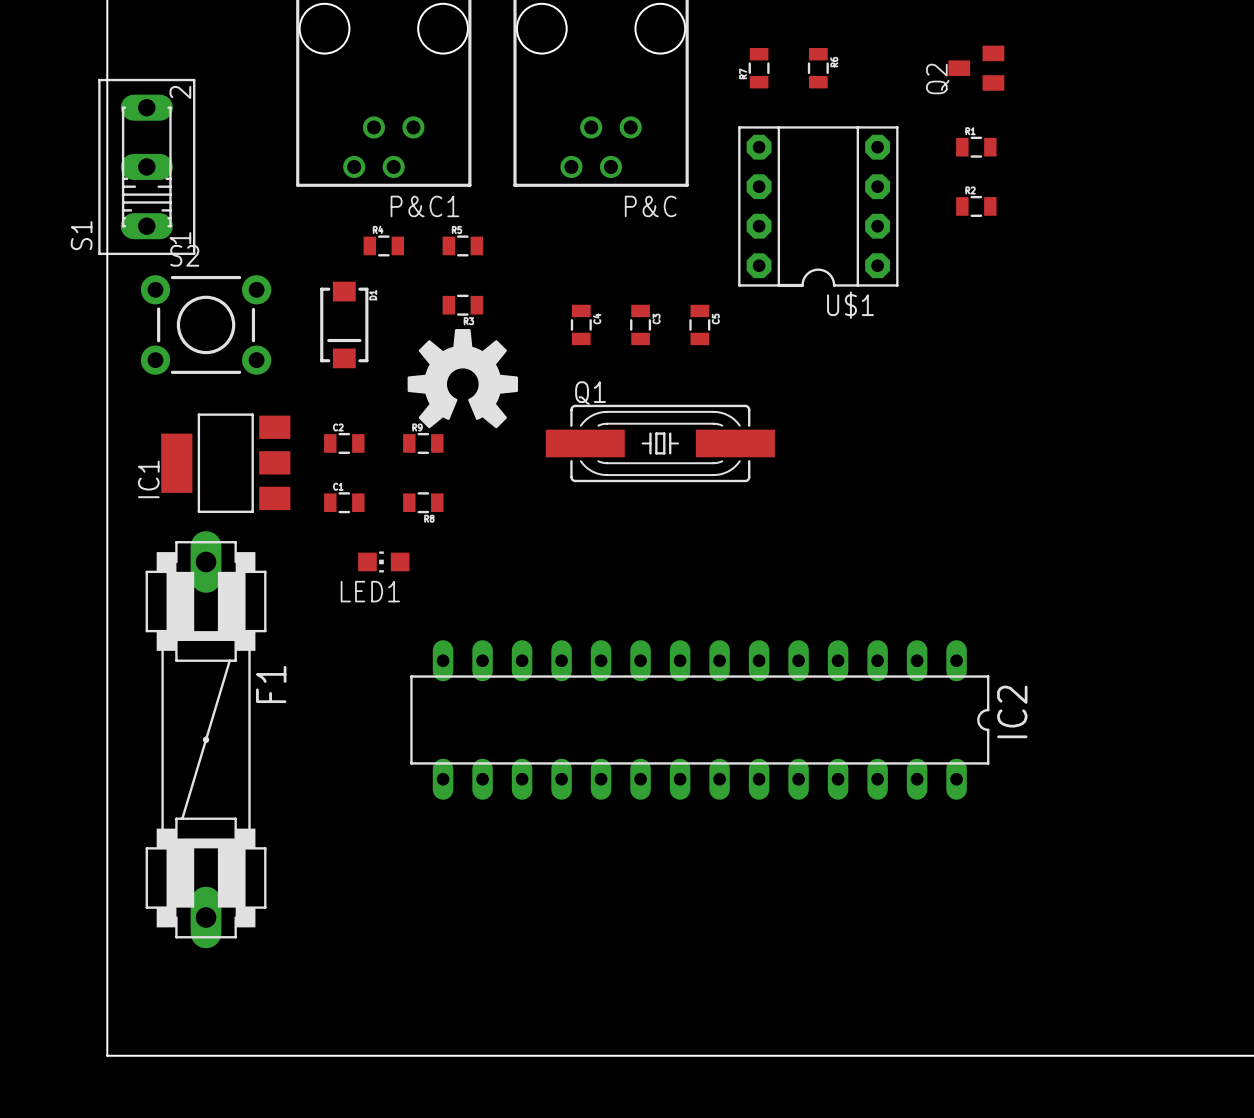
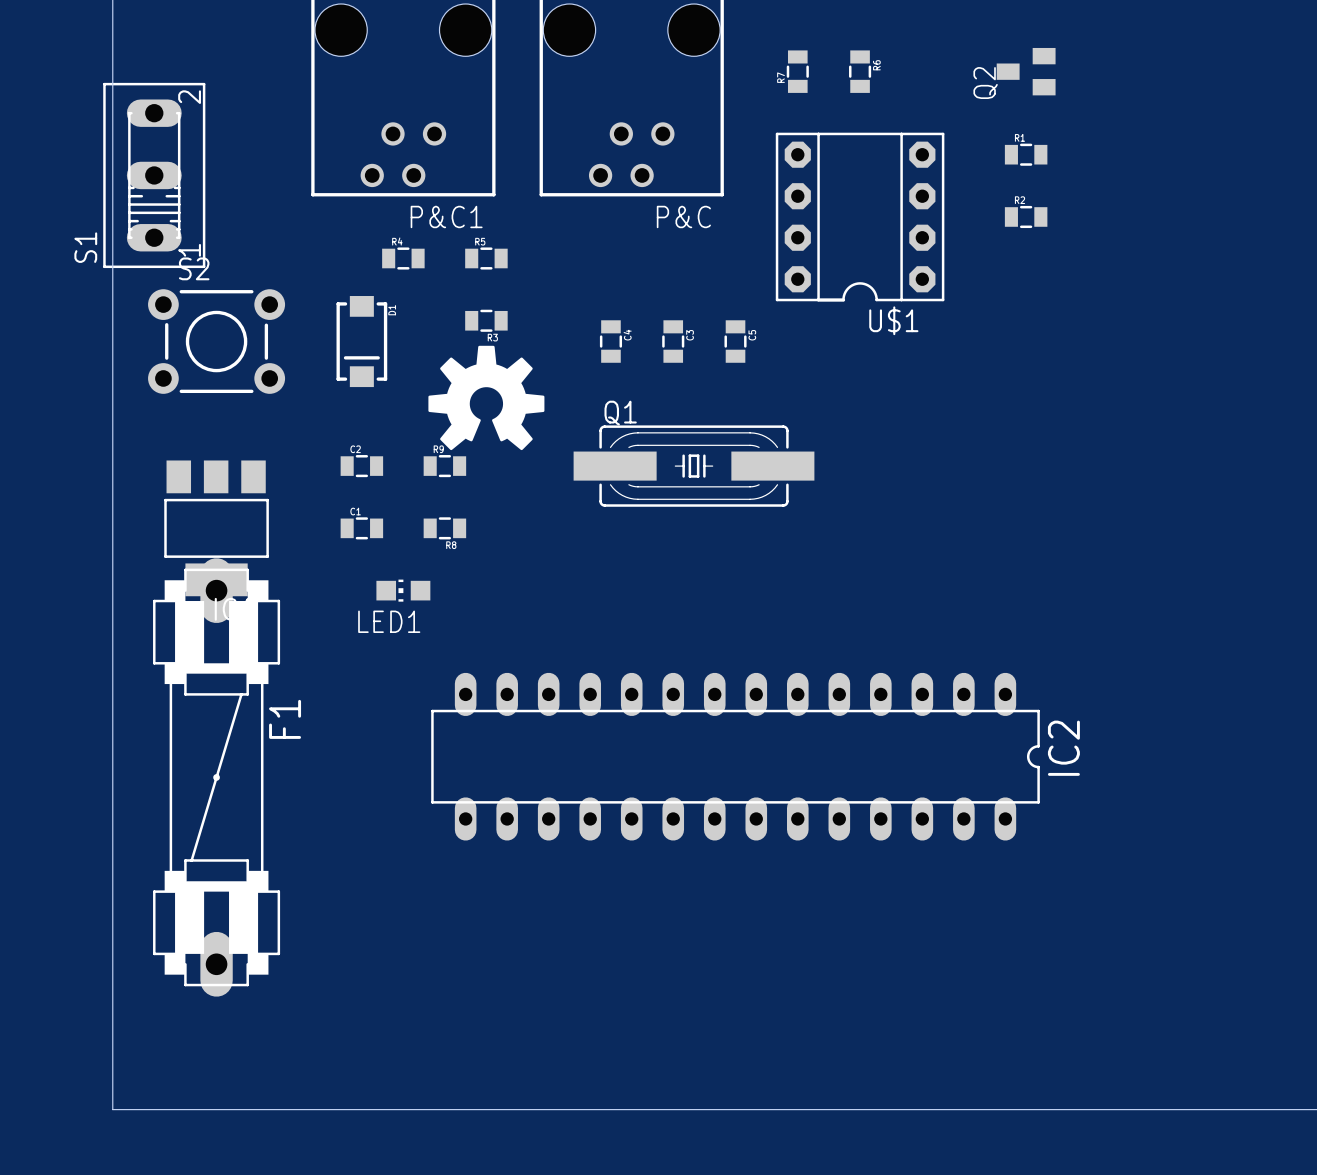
IC1 rotation: 0° (225, 463) -> 90° counterclockwise (216, 528)

